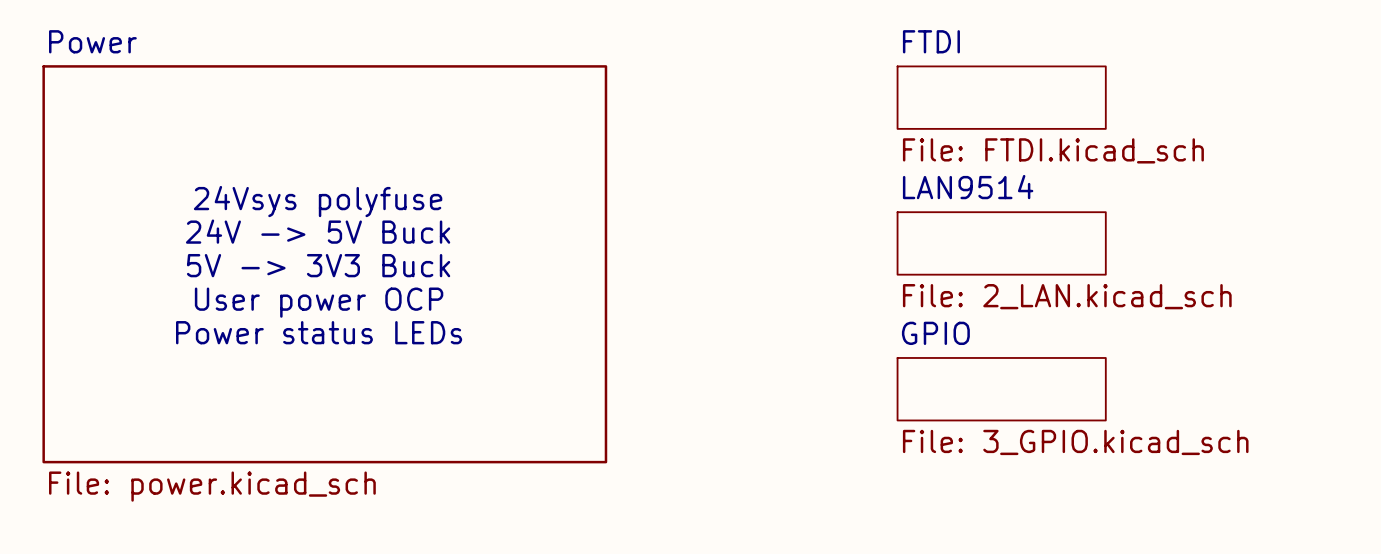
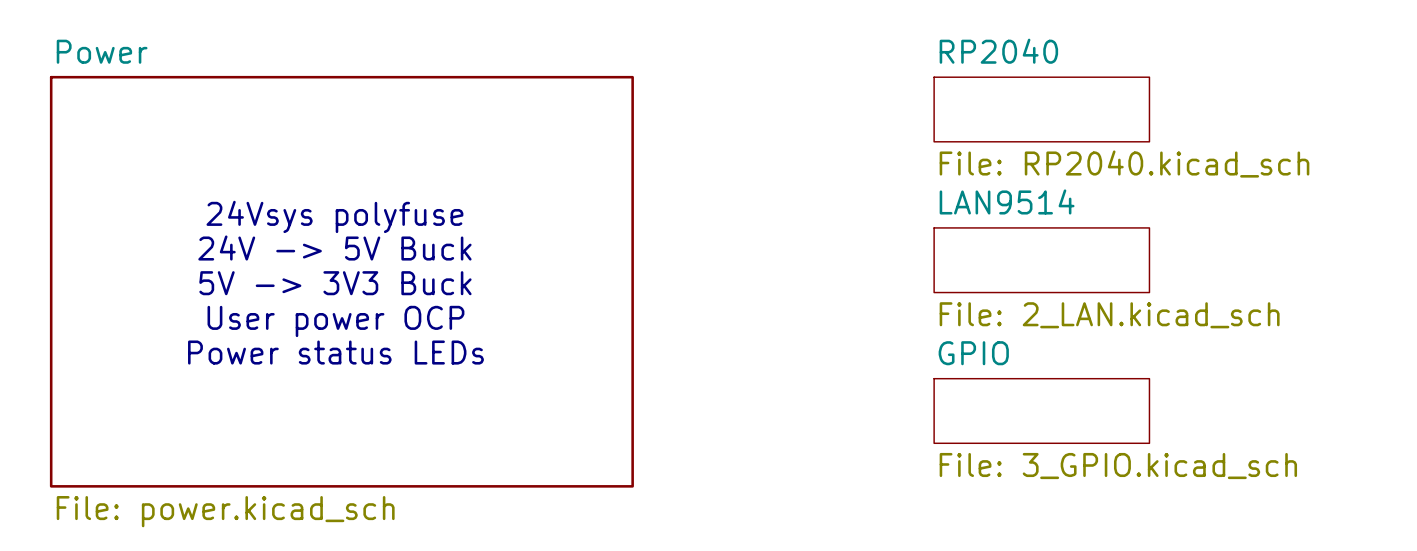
sheet FTDI name: FTDI (931, 41) -> RP2040 (998, 51)
sheet FTDI value: File: FTDI.kicad_sch (1053, 150) -> File: RP2040.kicad_sch (1124, 164)

